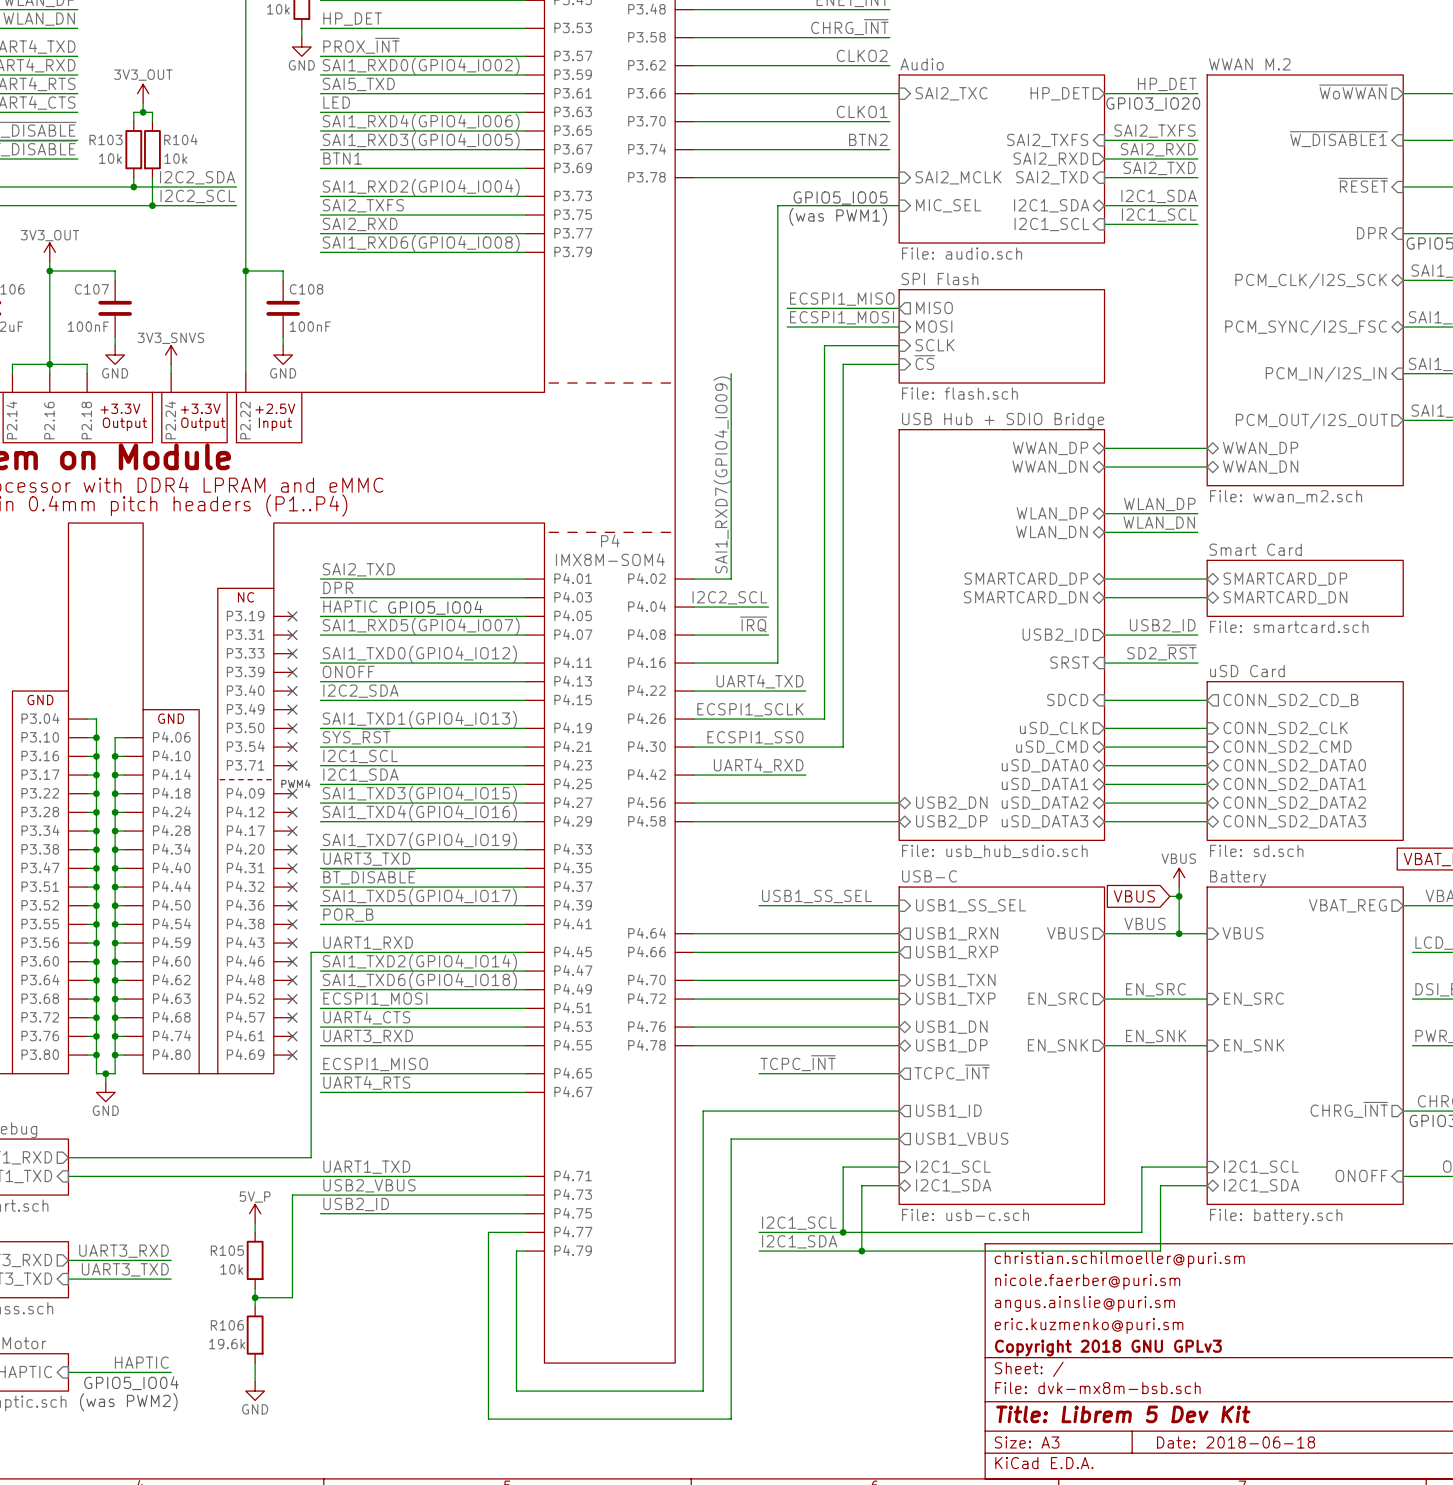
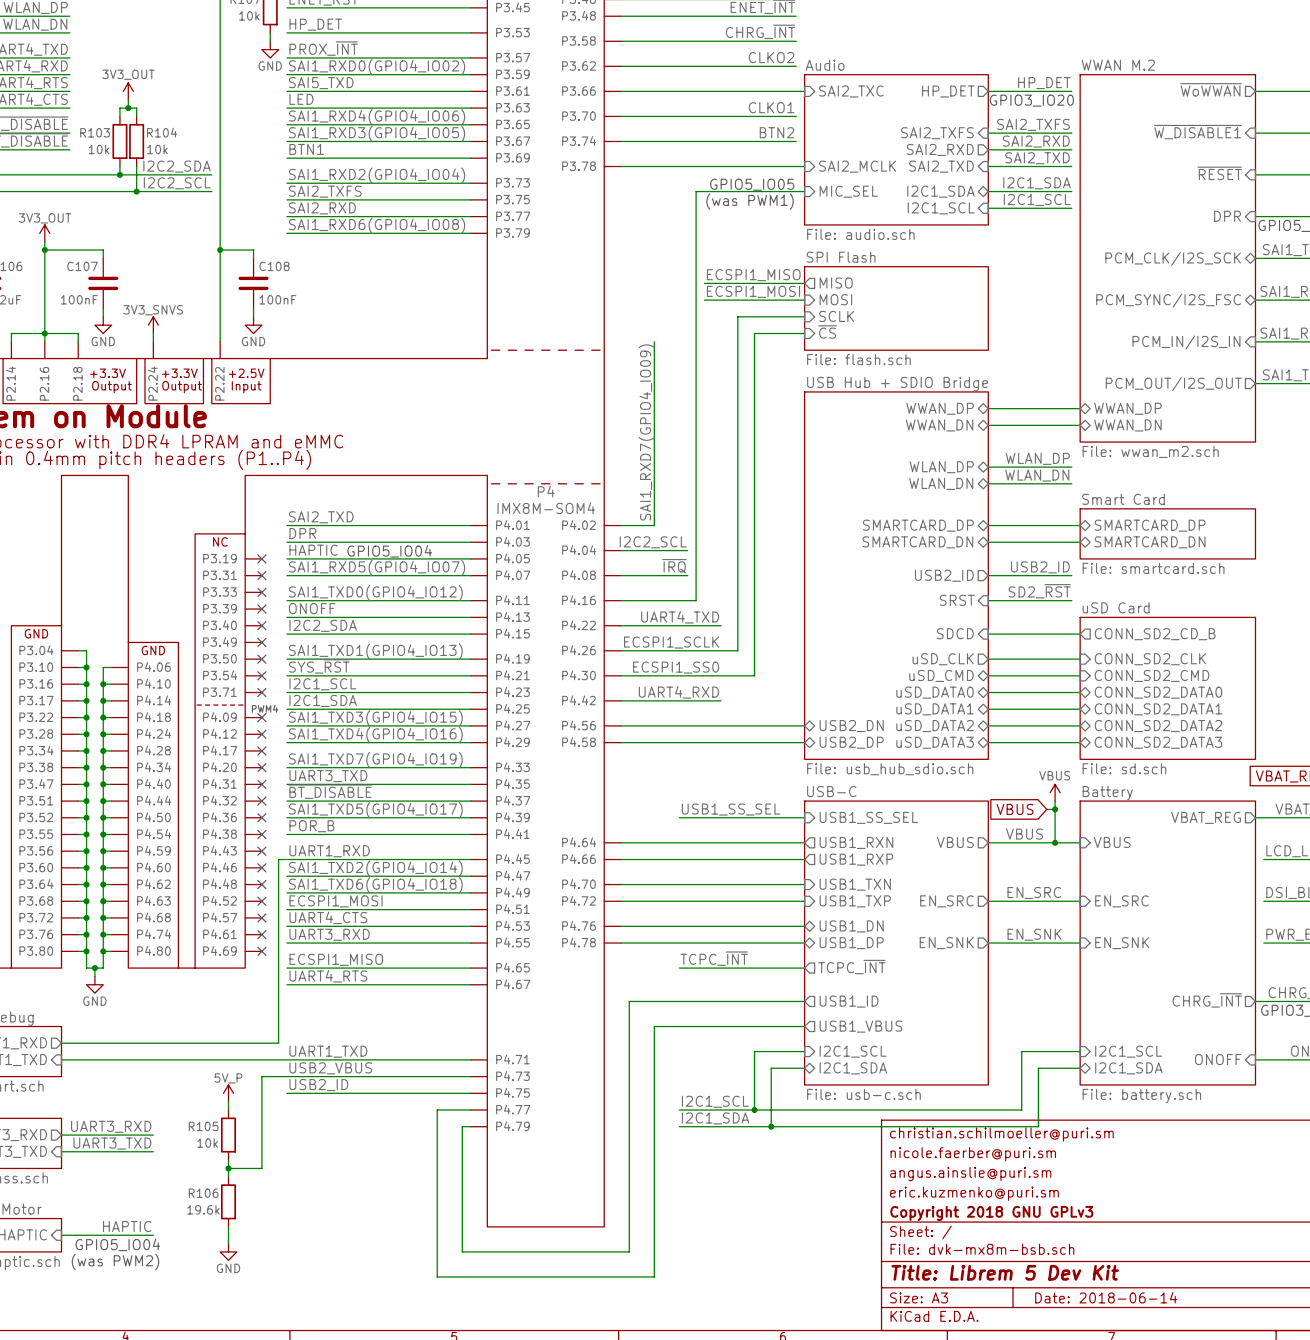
title block: Date: 2018-06-18 (1236, 1442) -> Date: 2018-06-14 (1106, 1297)

